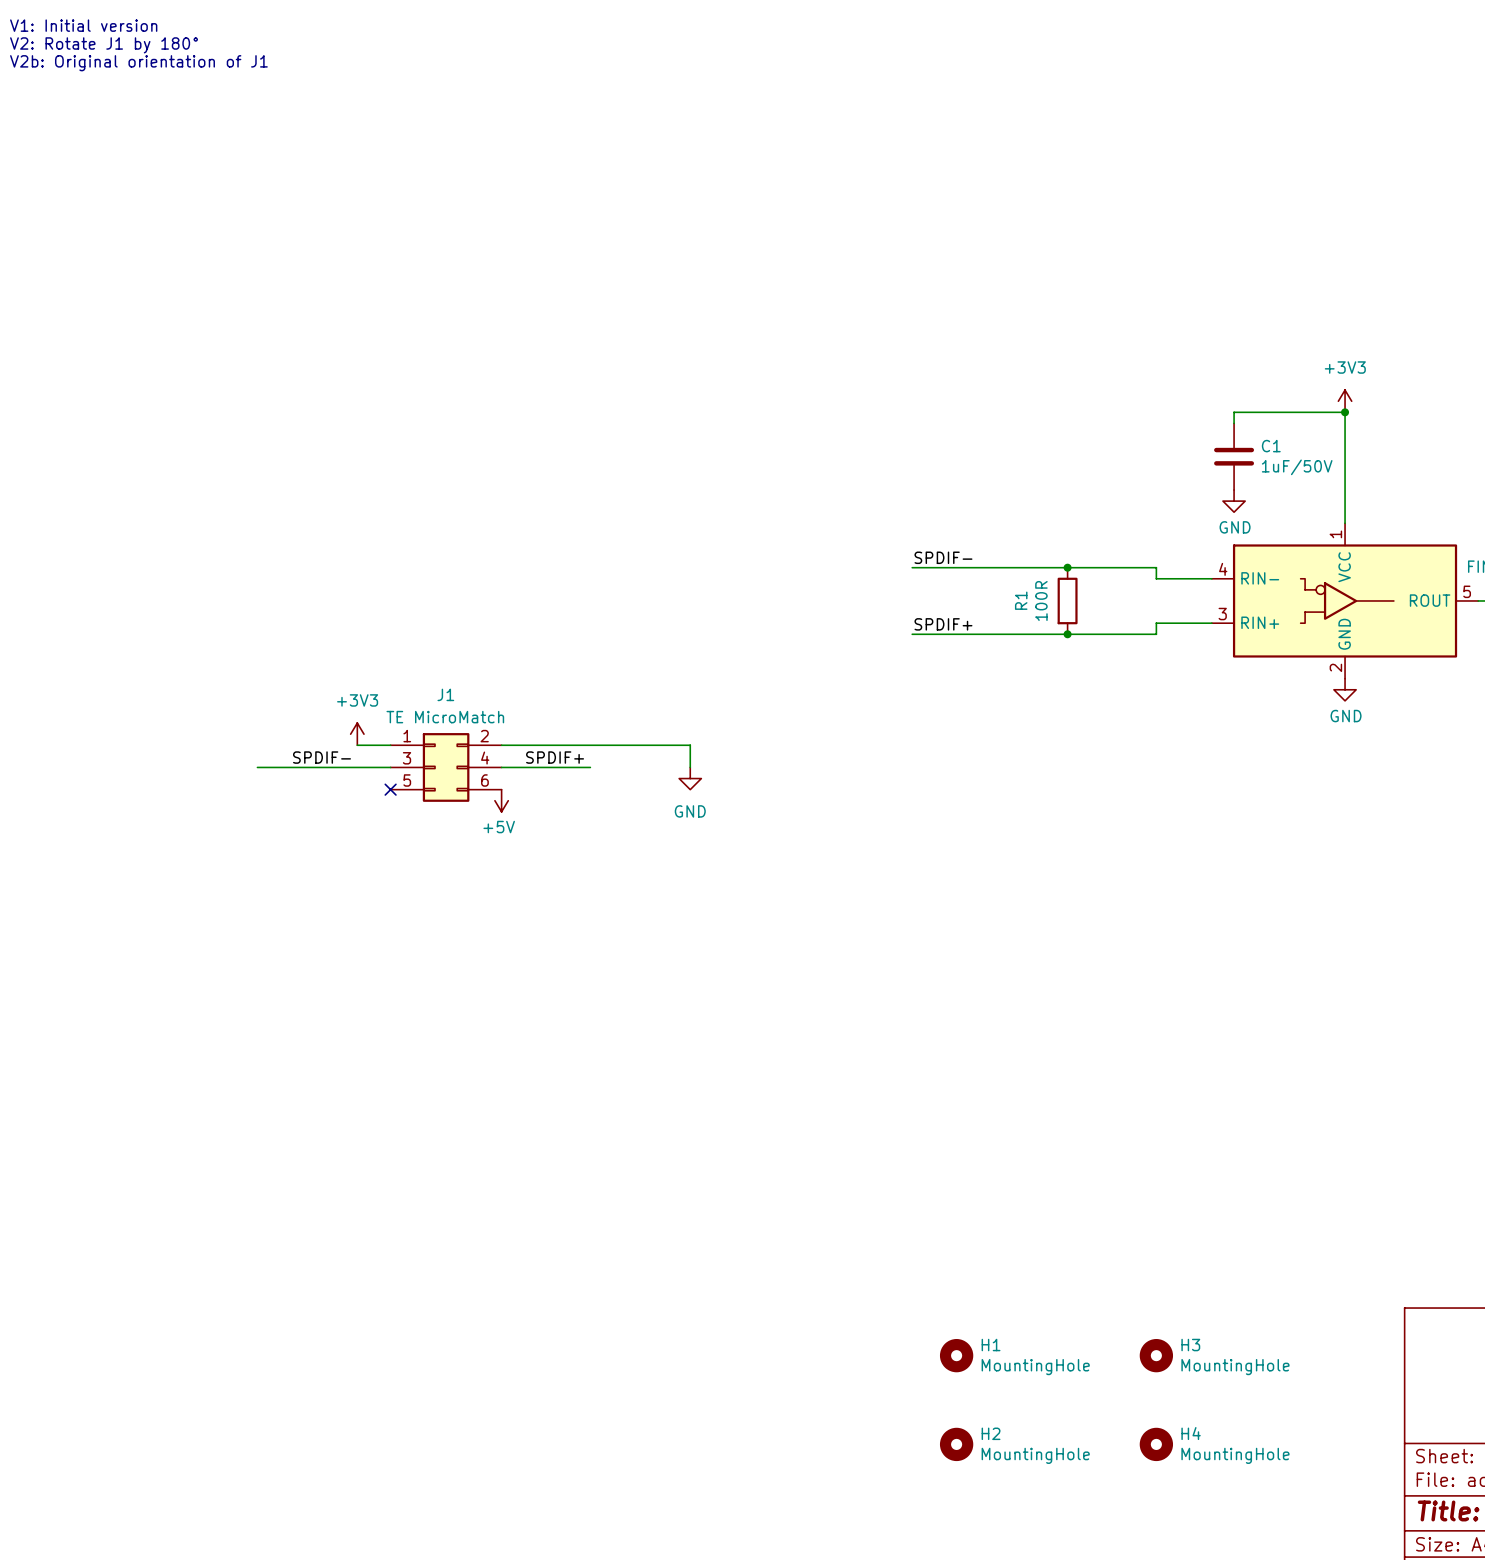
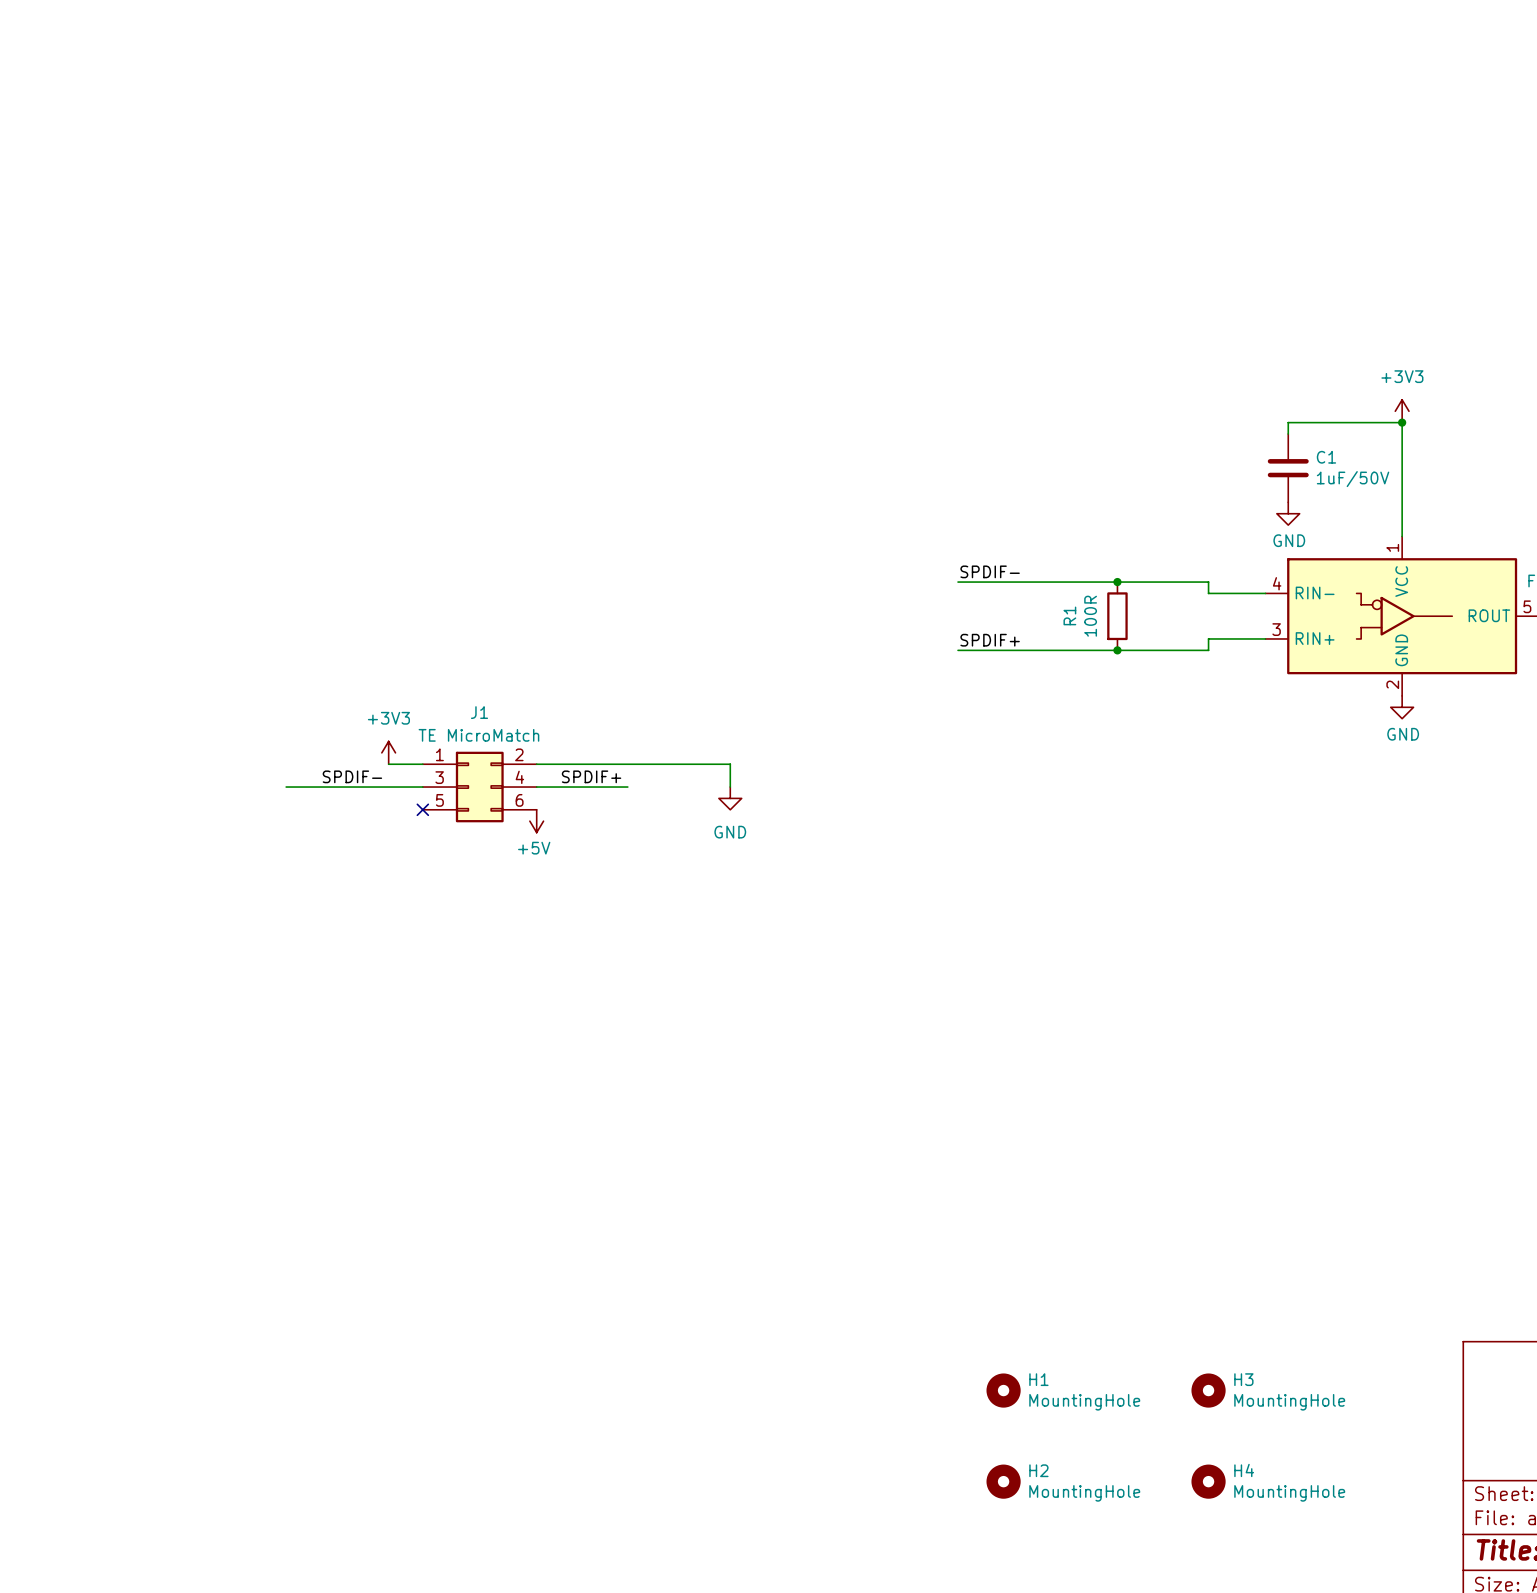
text: V1: Initial version (83, 25) -> none
text: V2: Rotate J1 by 180° (104, 45) -> none
text: V2b: Original orientation of J1 (138, 63) -> none

